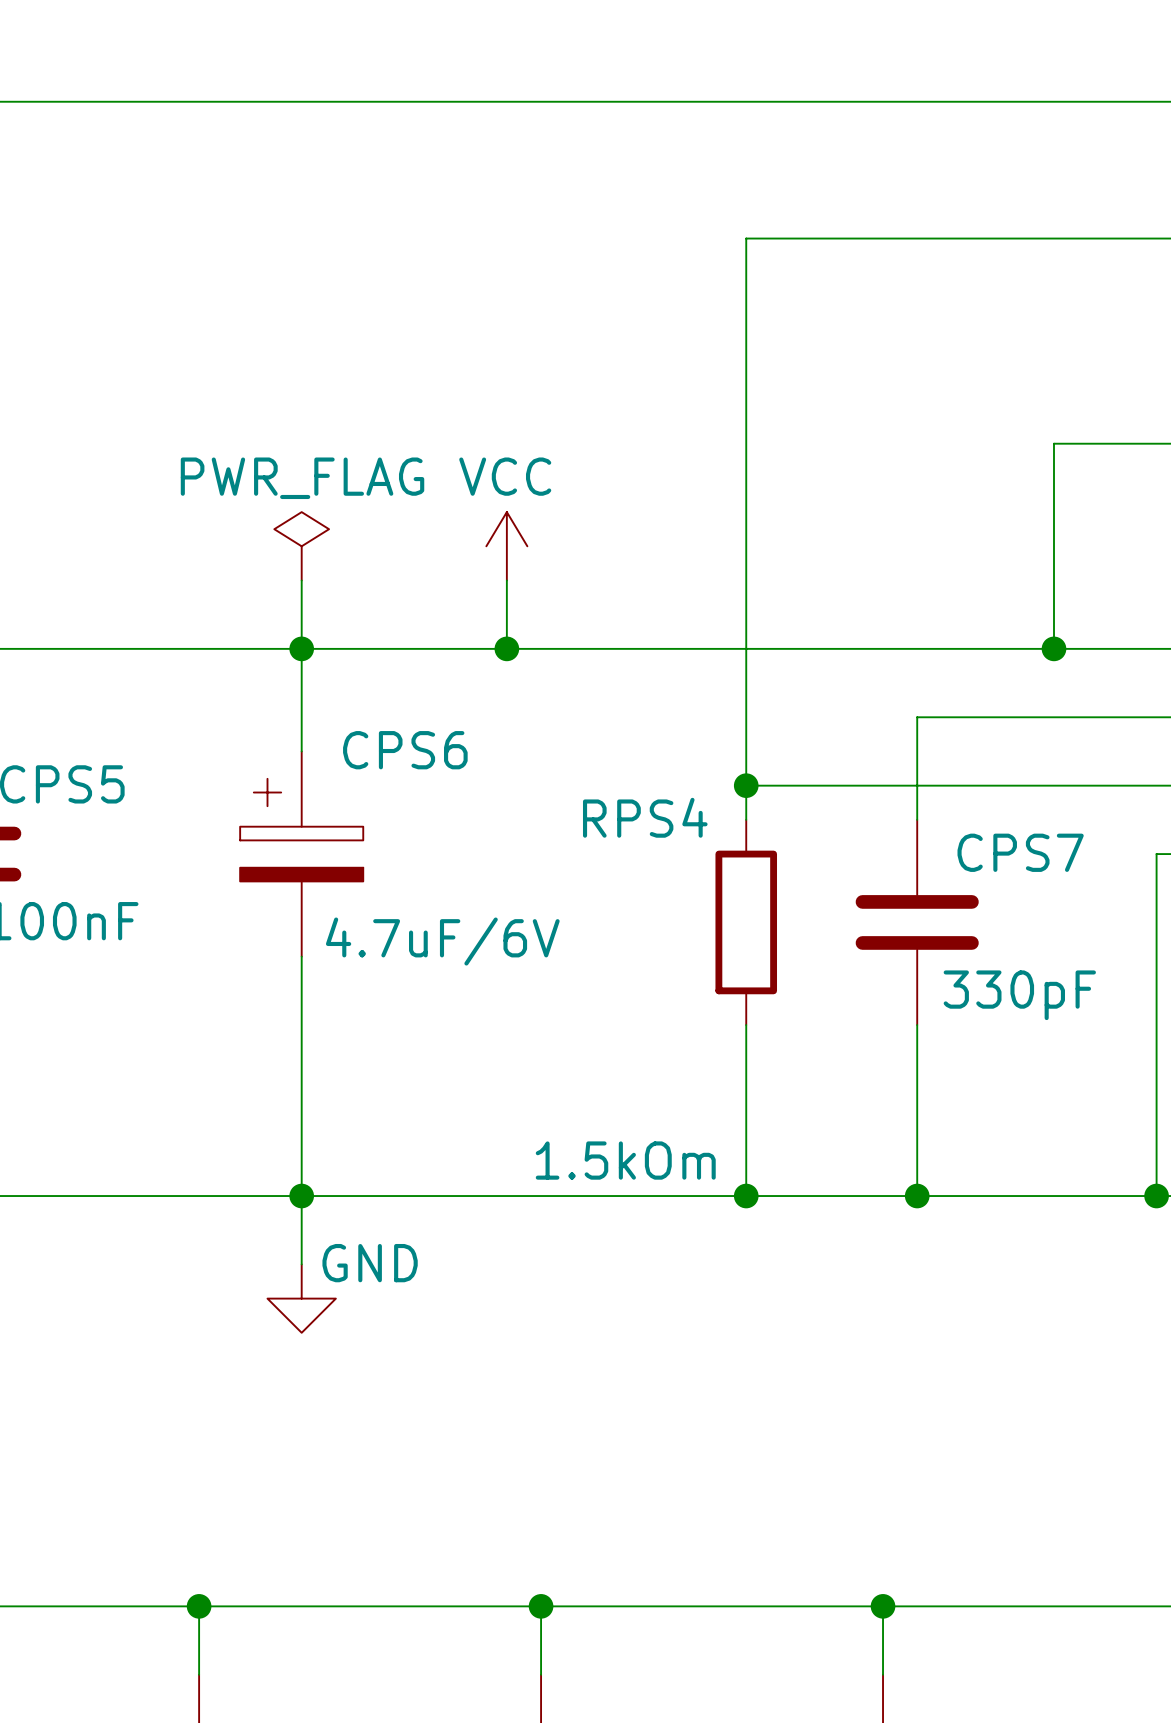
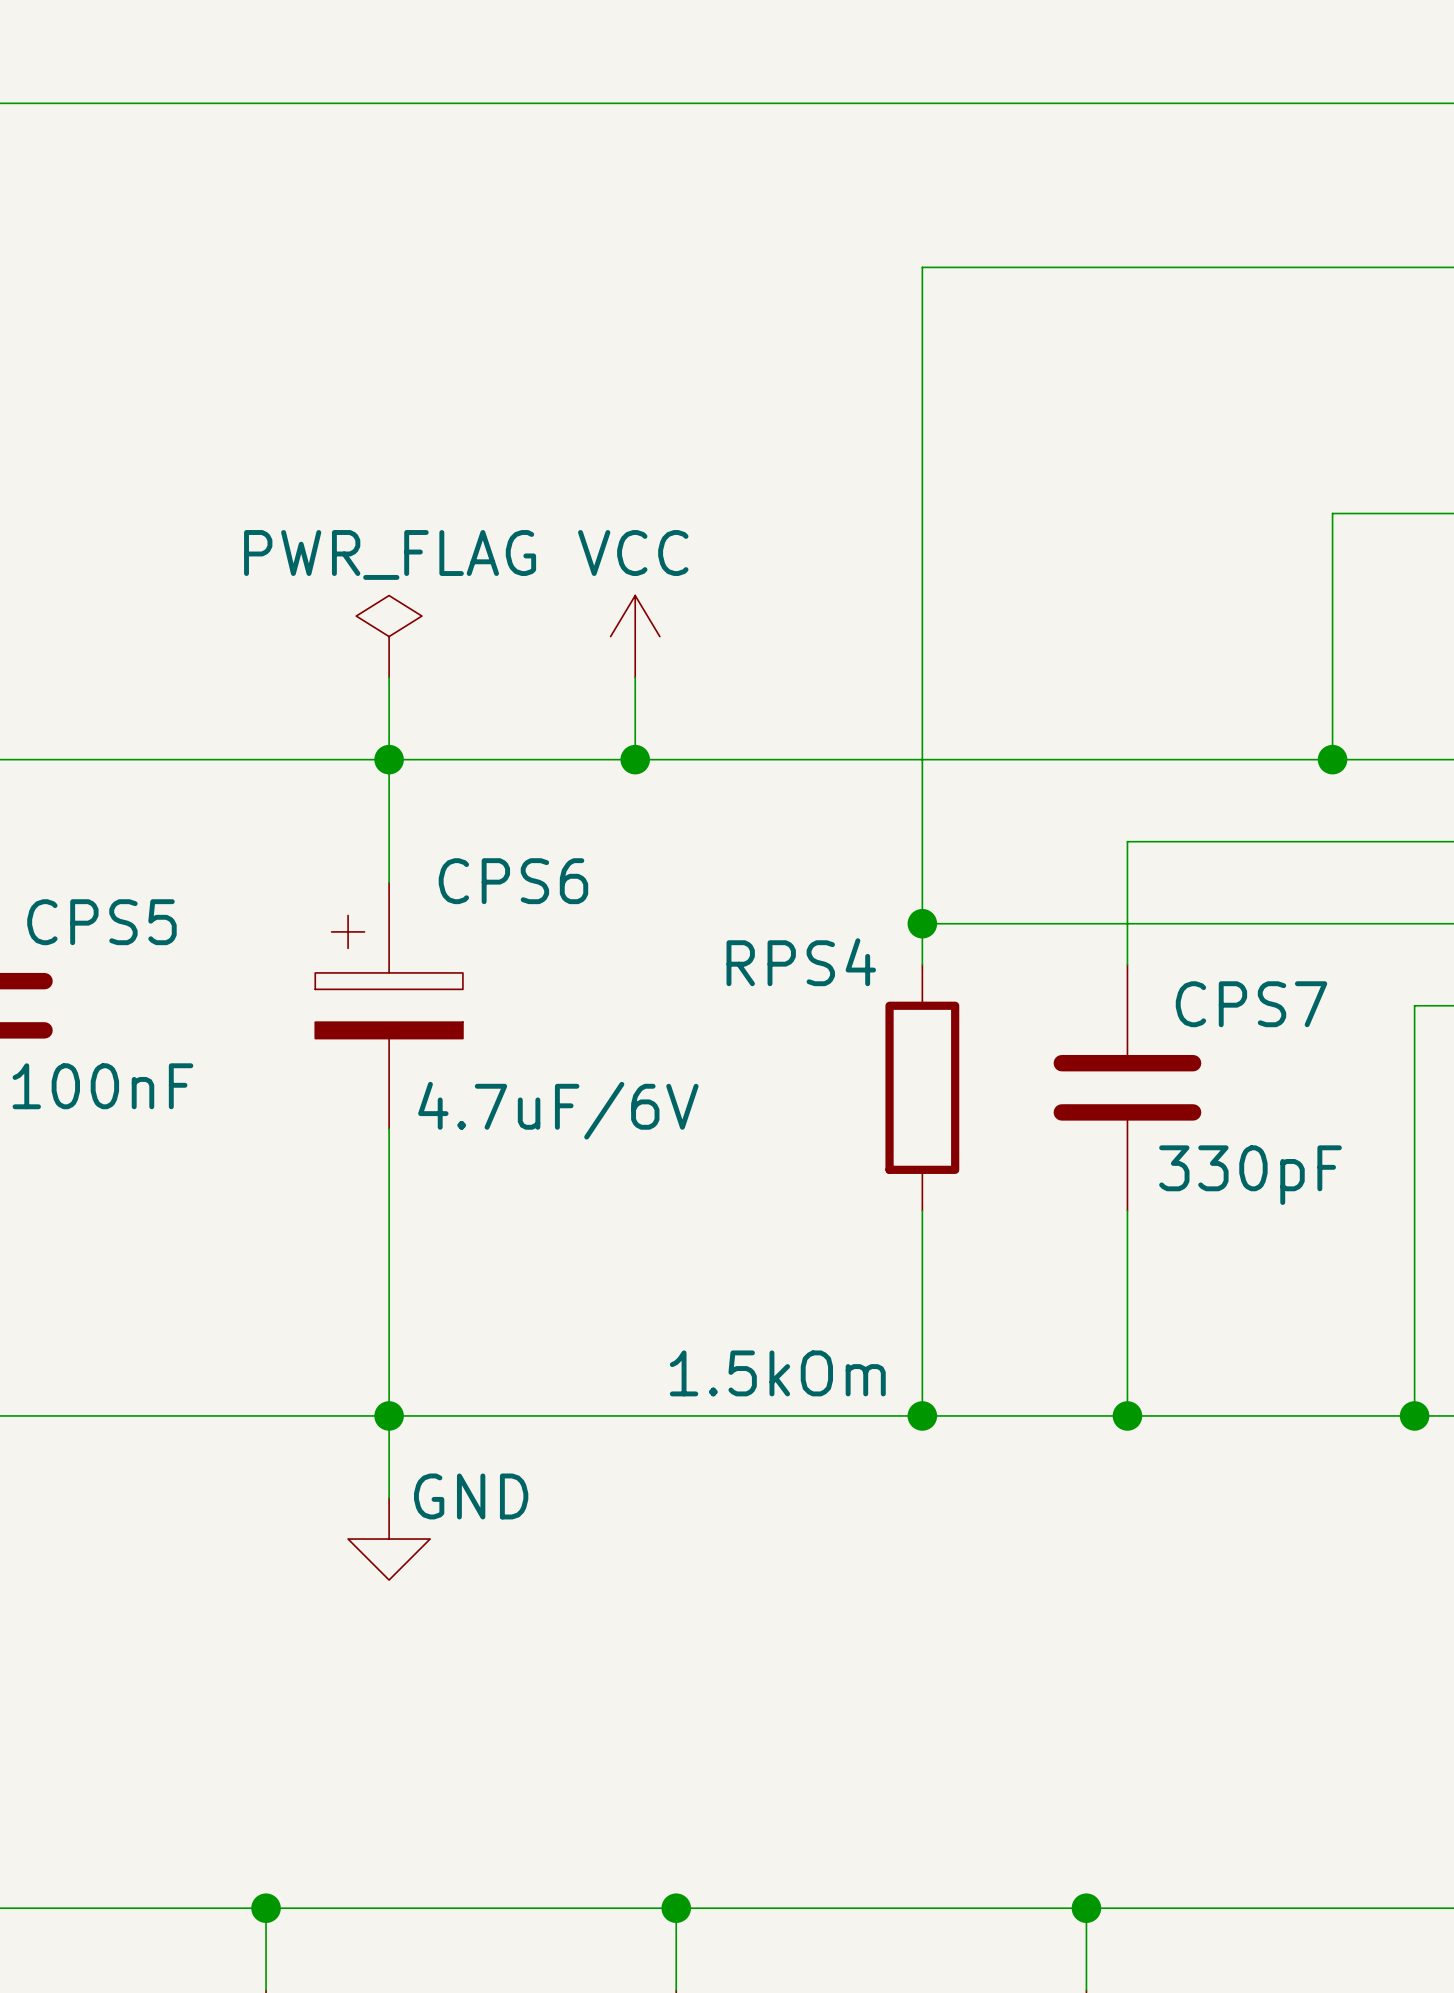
wire: (1088, 443) (1054, 443) (1054, 648) -> (1332, 513) (1332, 759)
junction position: (1054, 648) -> (1332, 759)

